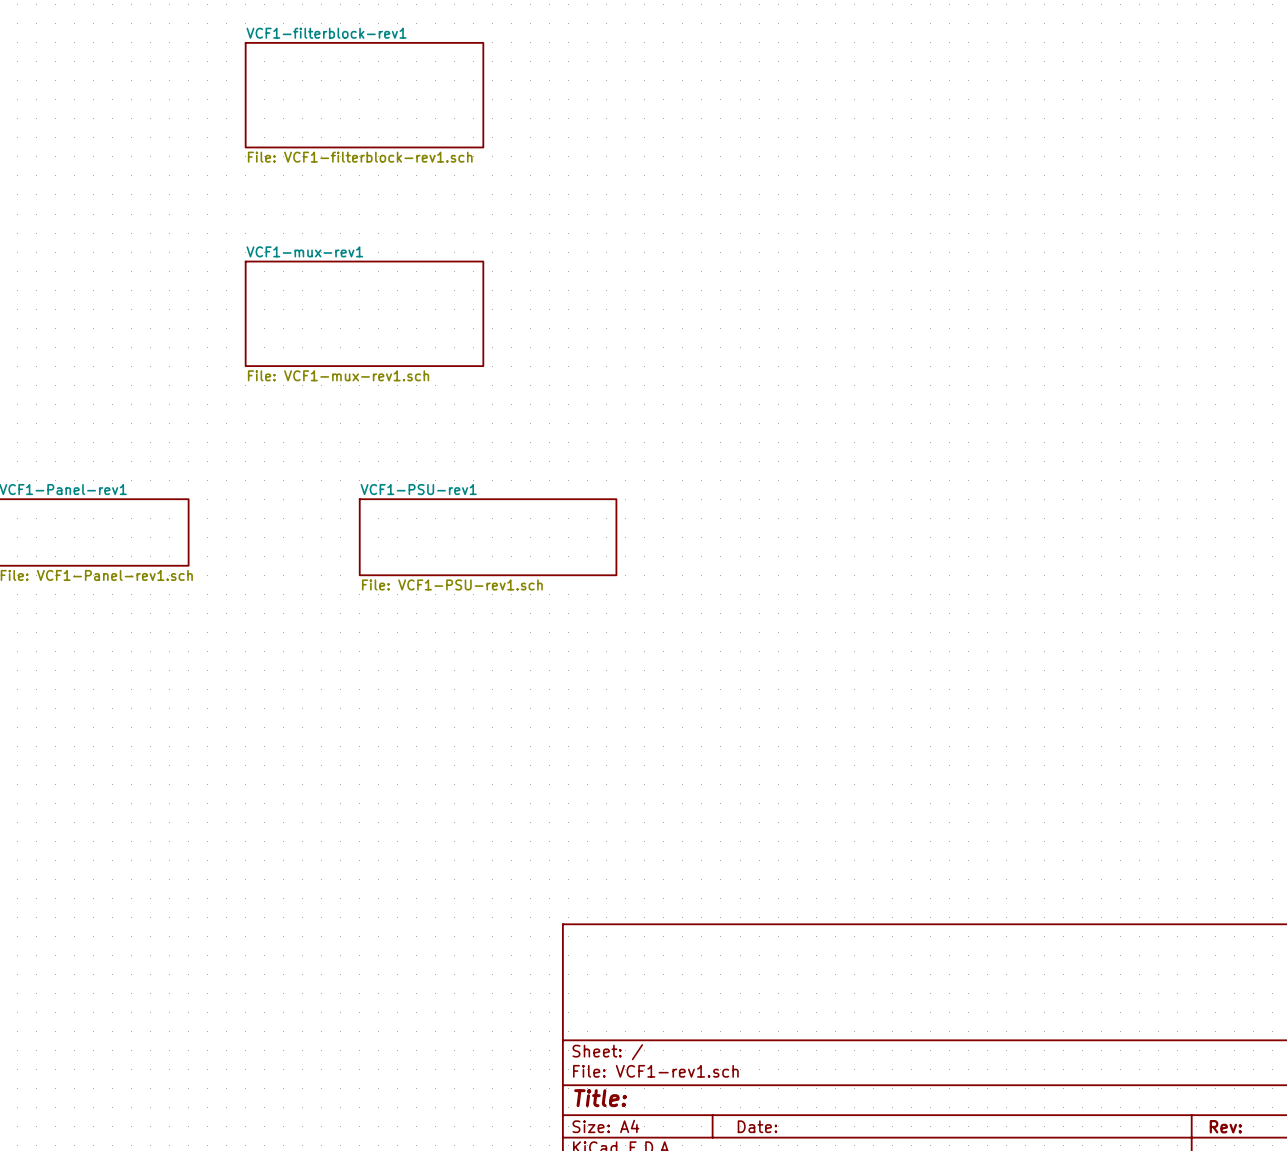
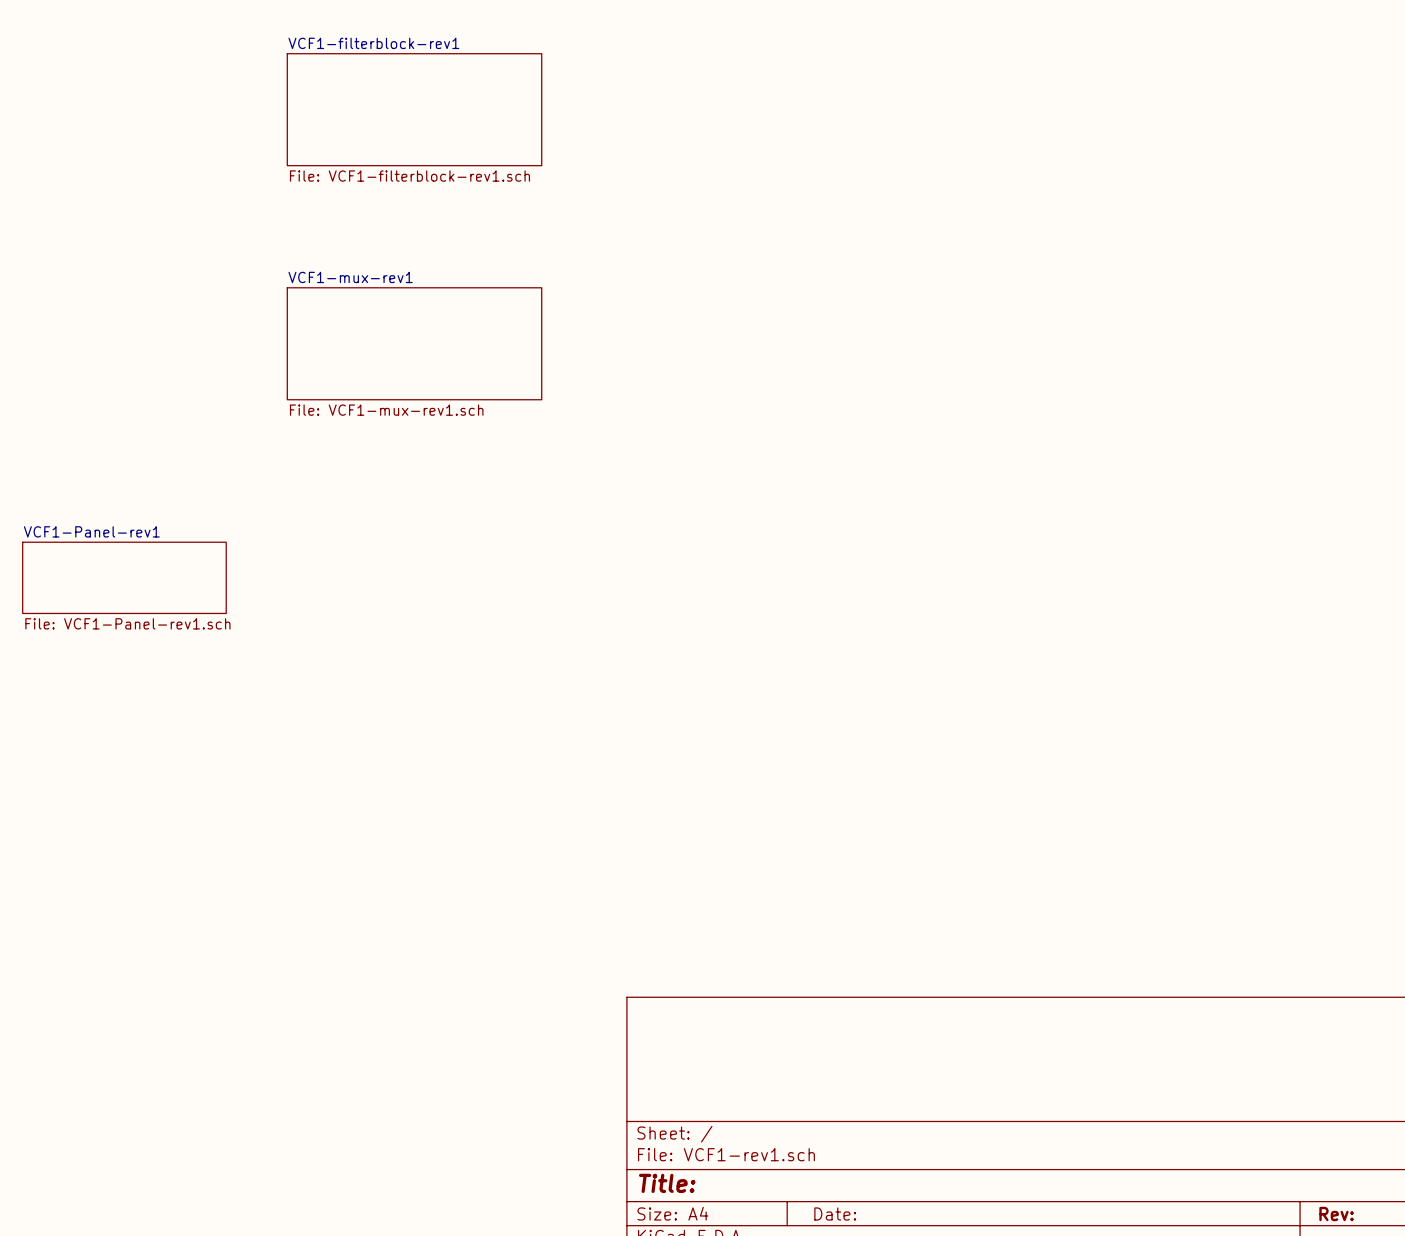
sheet VCF1-PSU-rev1: File: VCF1-PSU-rev1.sch (488, 537) -> none

